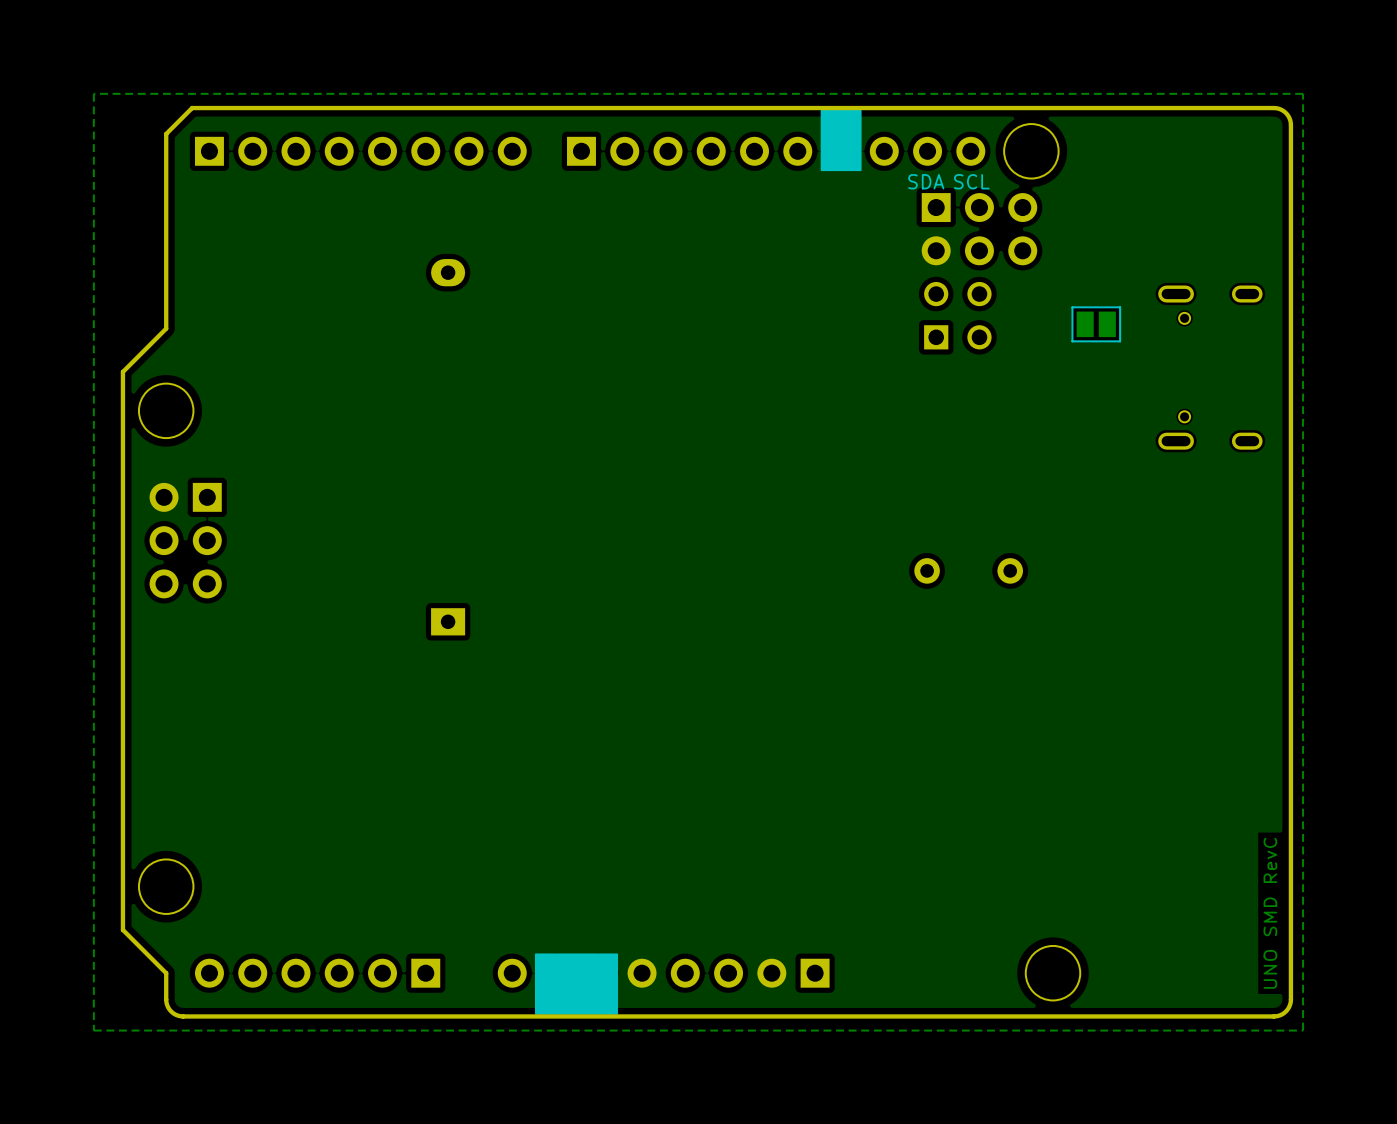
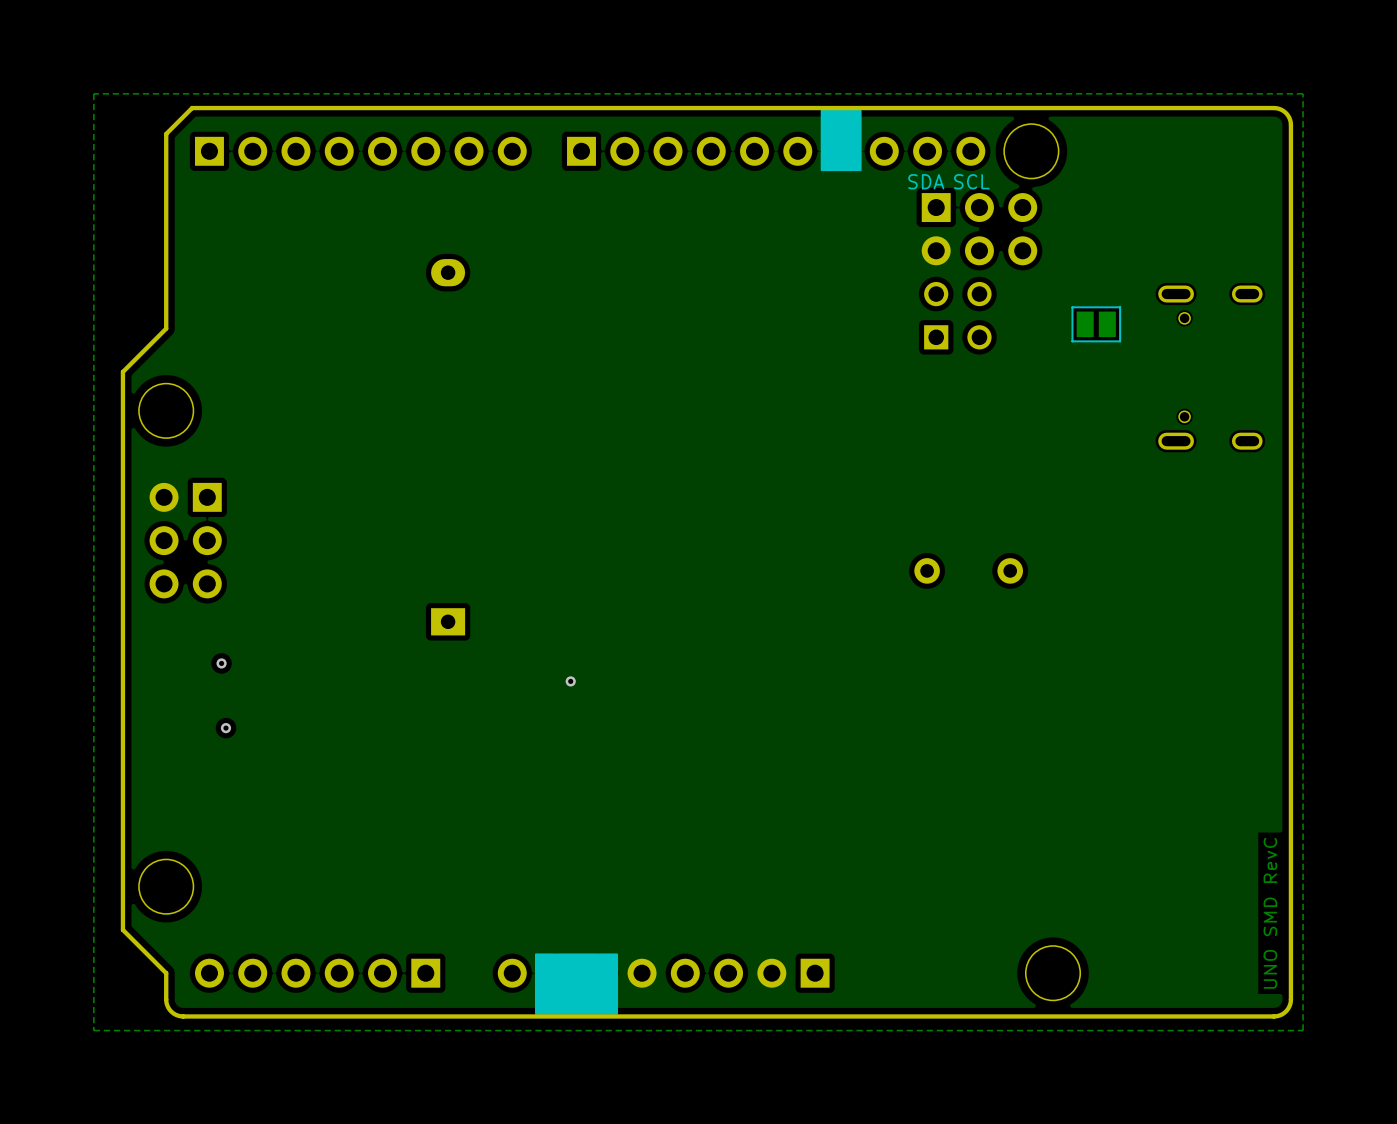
via: none -> (221, 663)
via: none -> (570, 681)
via: none -> (225, 728)

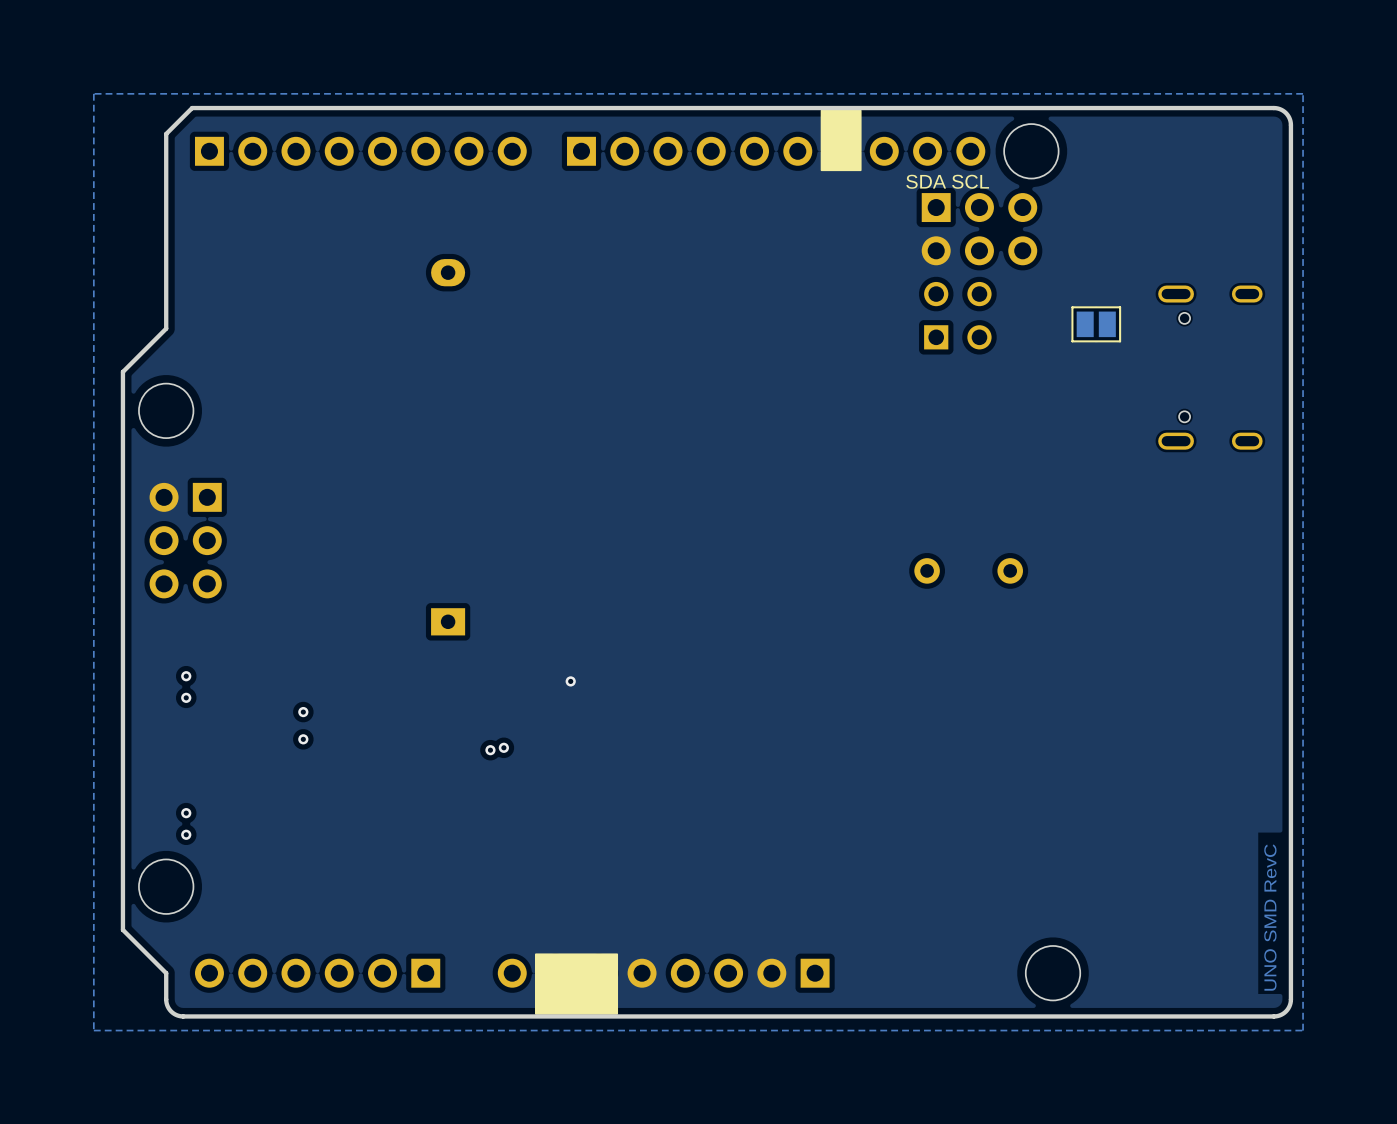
via: (221, 663) -> none
via: none -> (186, 676)
via: none -> (186, 697)
via: none -> (303, 712)
via: (225, 728) -> none
via: none -> (303, 739)
via: none -> (503, 747)
via: none -> (490, 750)
via: none -> (186, 813)
via: none -> (186, 834)

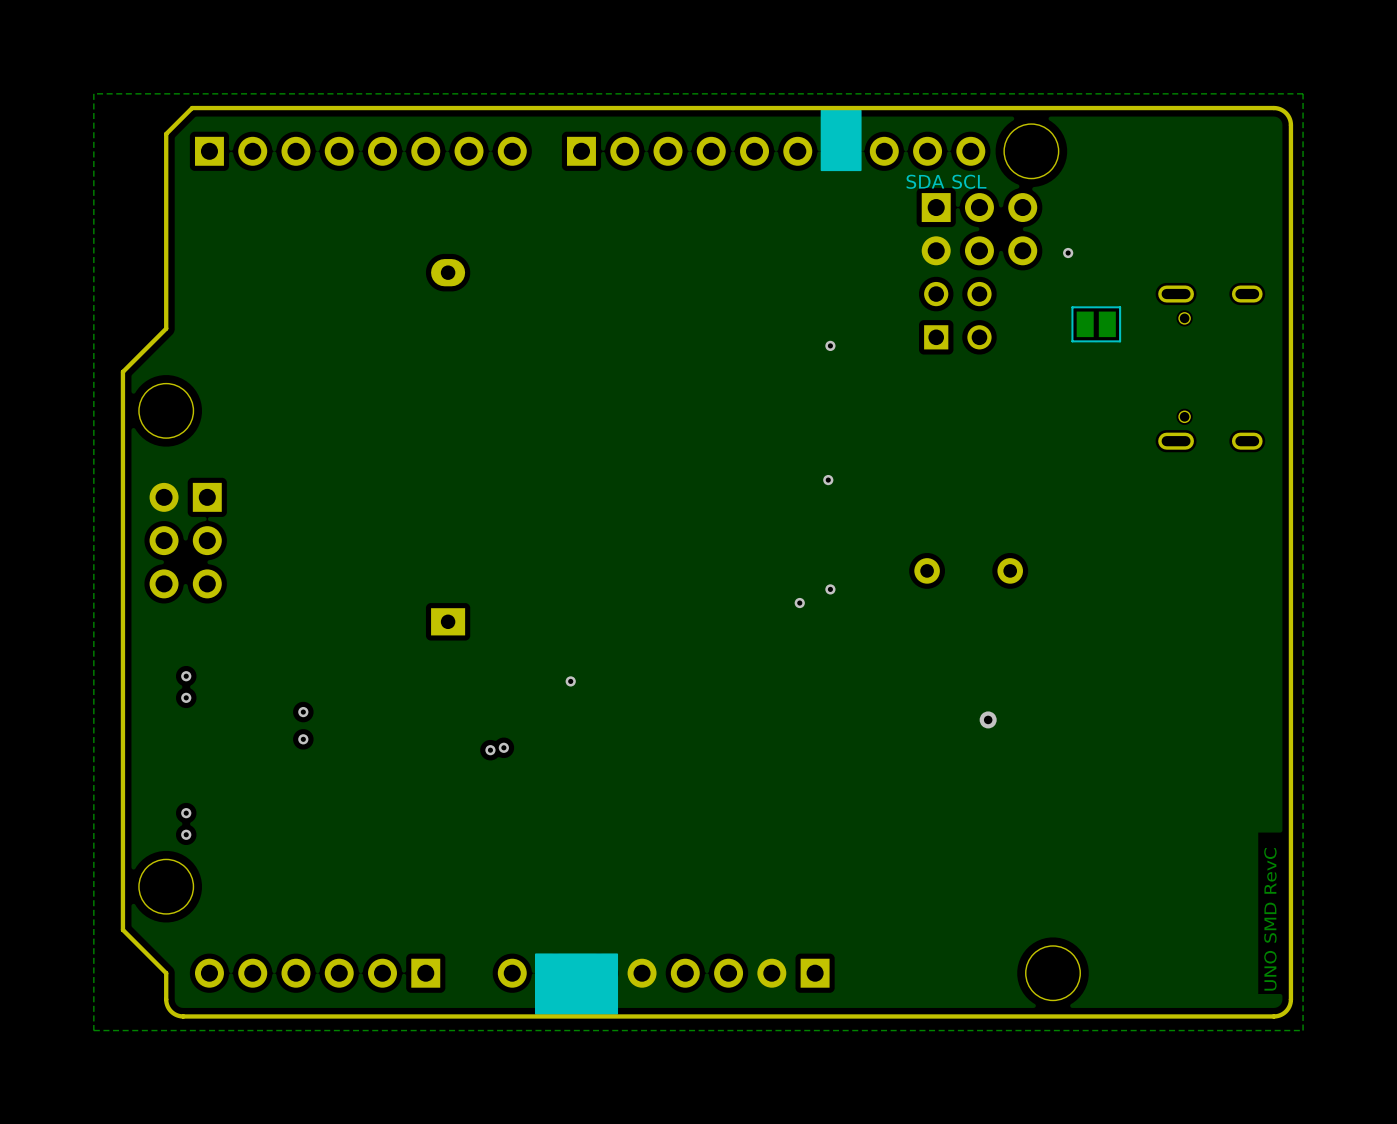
via: none -> (1068, 253)
via: none -> (830, 345)
via: none -> (828, 480)
via: none -> (830, 589)
via: none -> (799, 603)
via: none -> (988, 719)

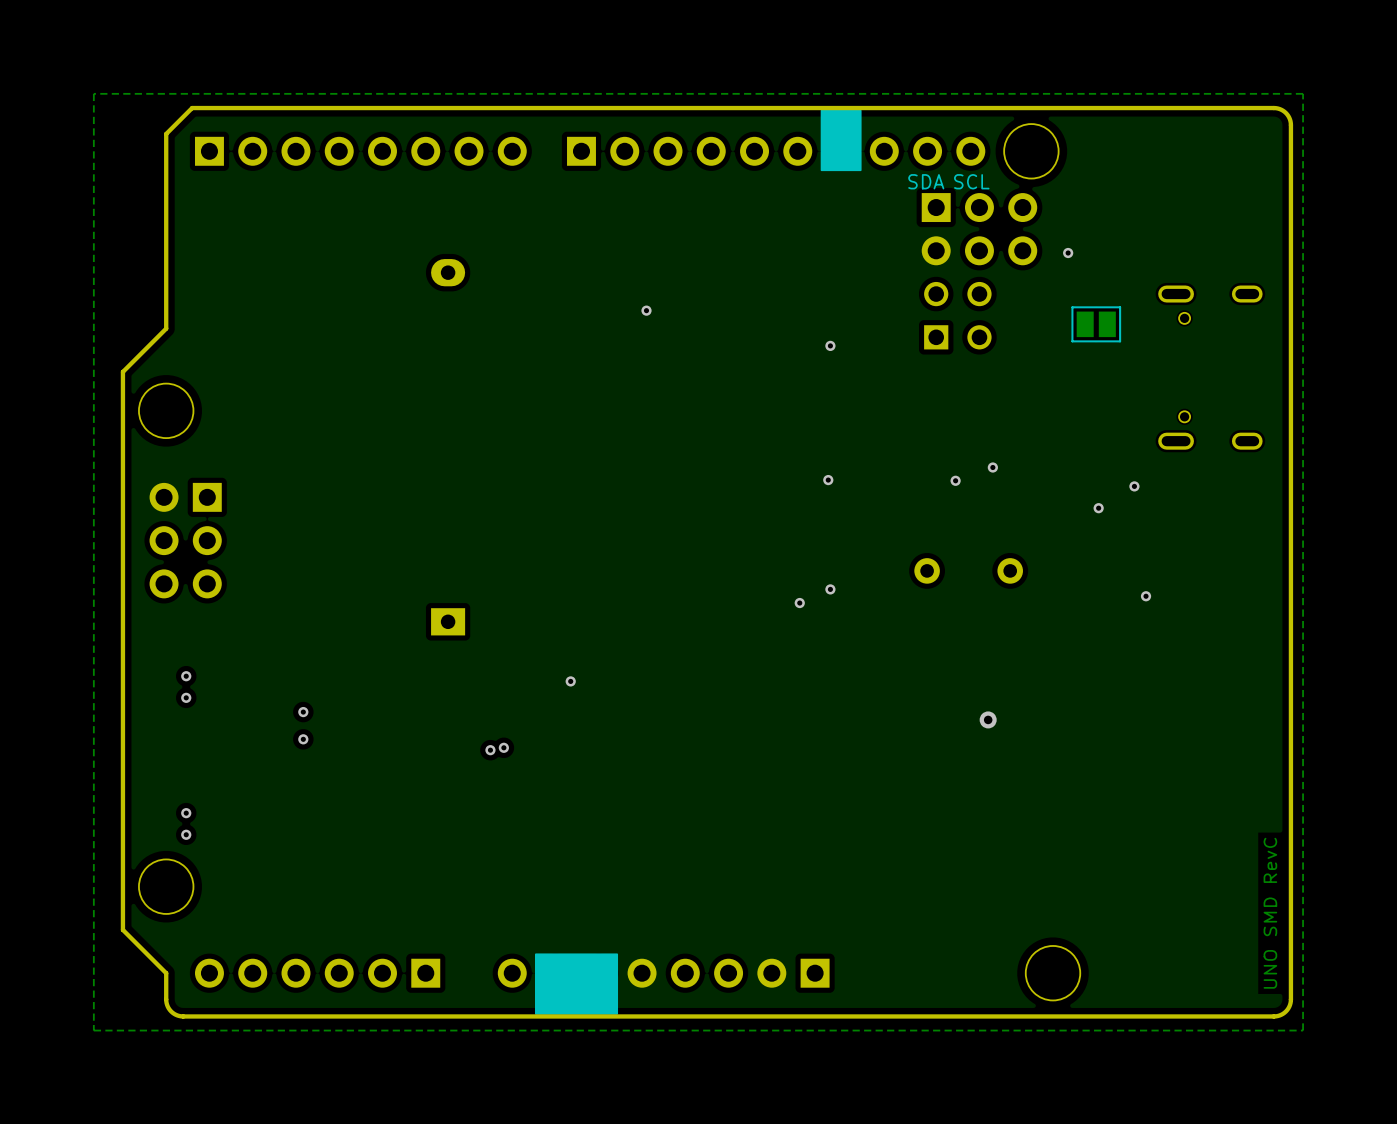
via: none -> (646, 310)
via: none -> (992, 467)
via: none -> (955, 480)
via: none -> (1134, 486)
via: none -> (1098, 508)
via: none -> (1146, 596)

